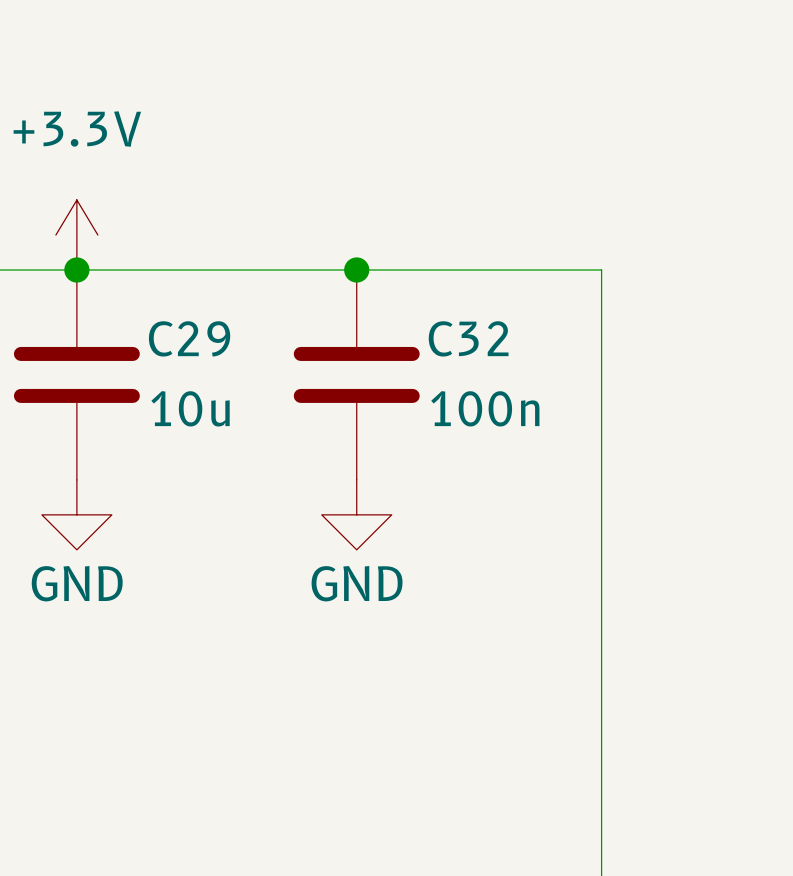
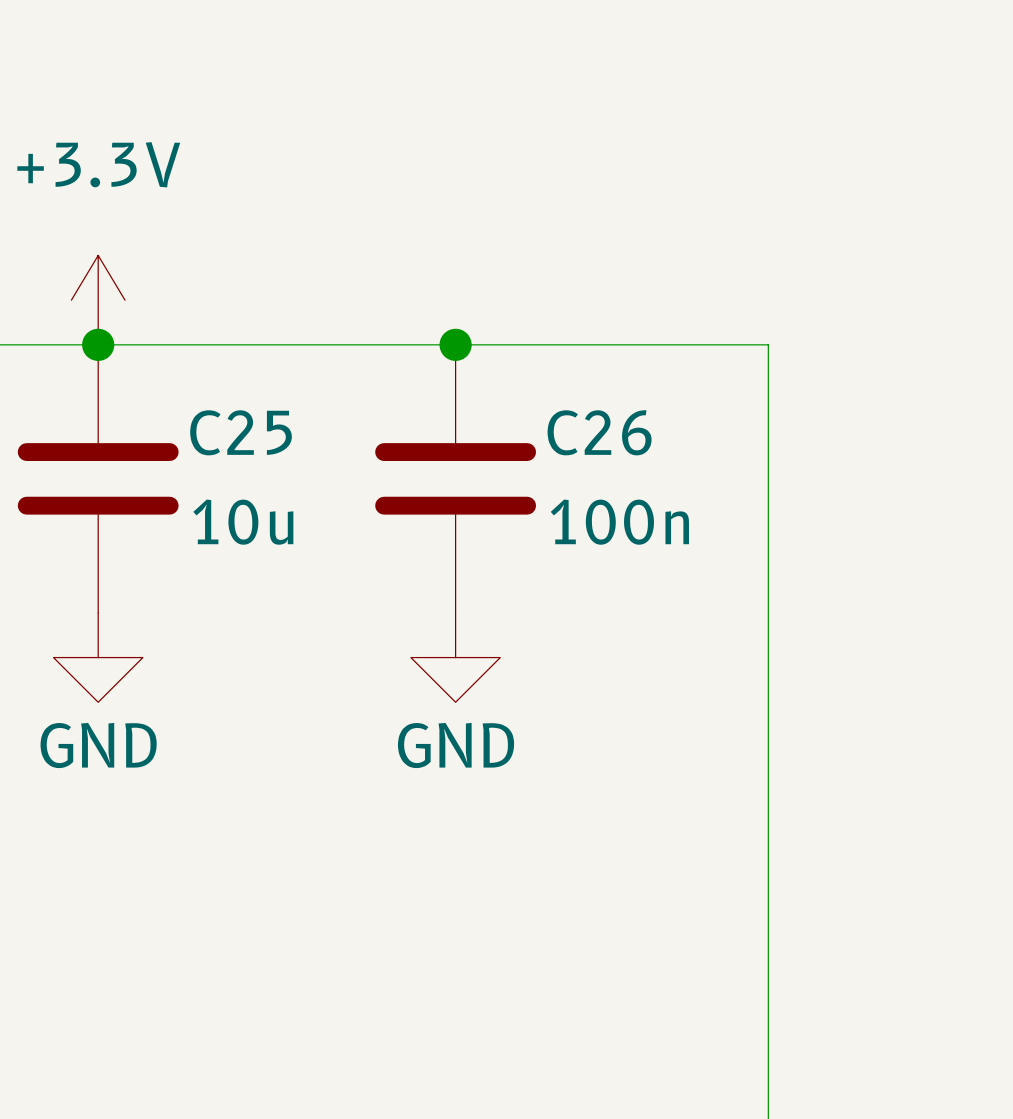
C29 name: C29 (189, 338) -> C25 (241, 432)
C32 name: C32 (468, 338) -> C26 (599, 432)

